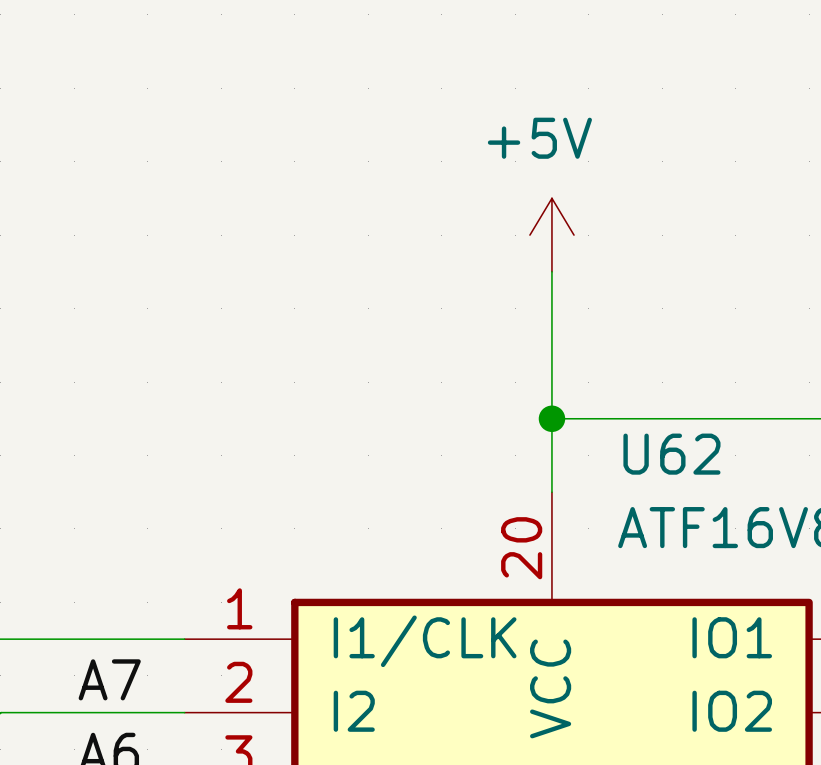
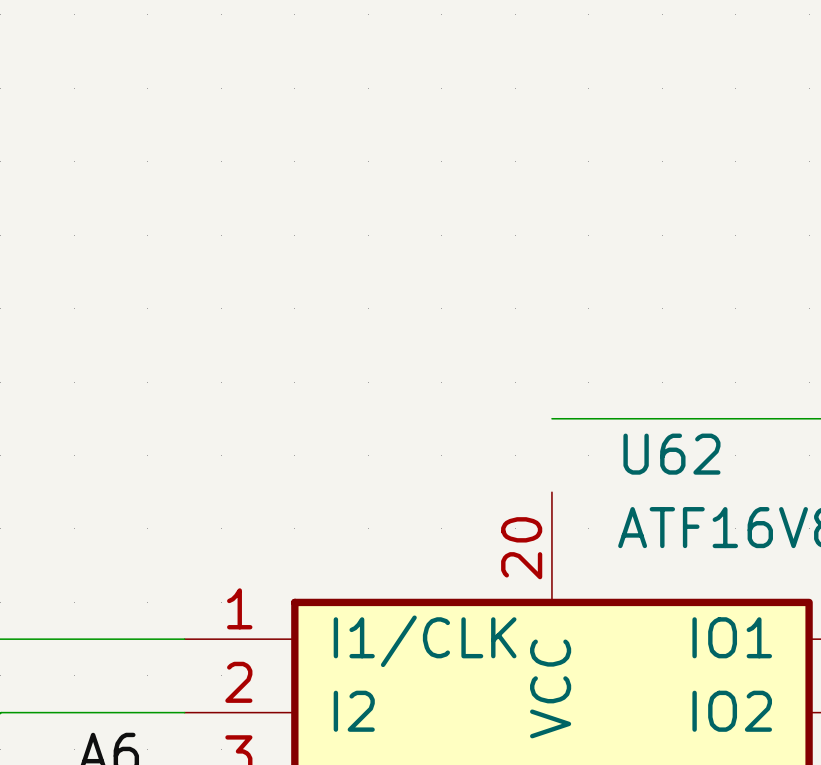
power symbol: +5V (551, 235) -> none
wire: (551, 271) (551, 492) -> none
junction: (551, 418) -> none
label: A7 (109, 679) -> none

